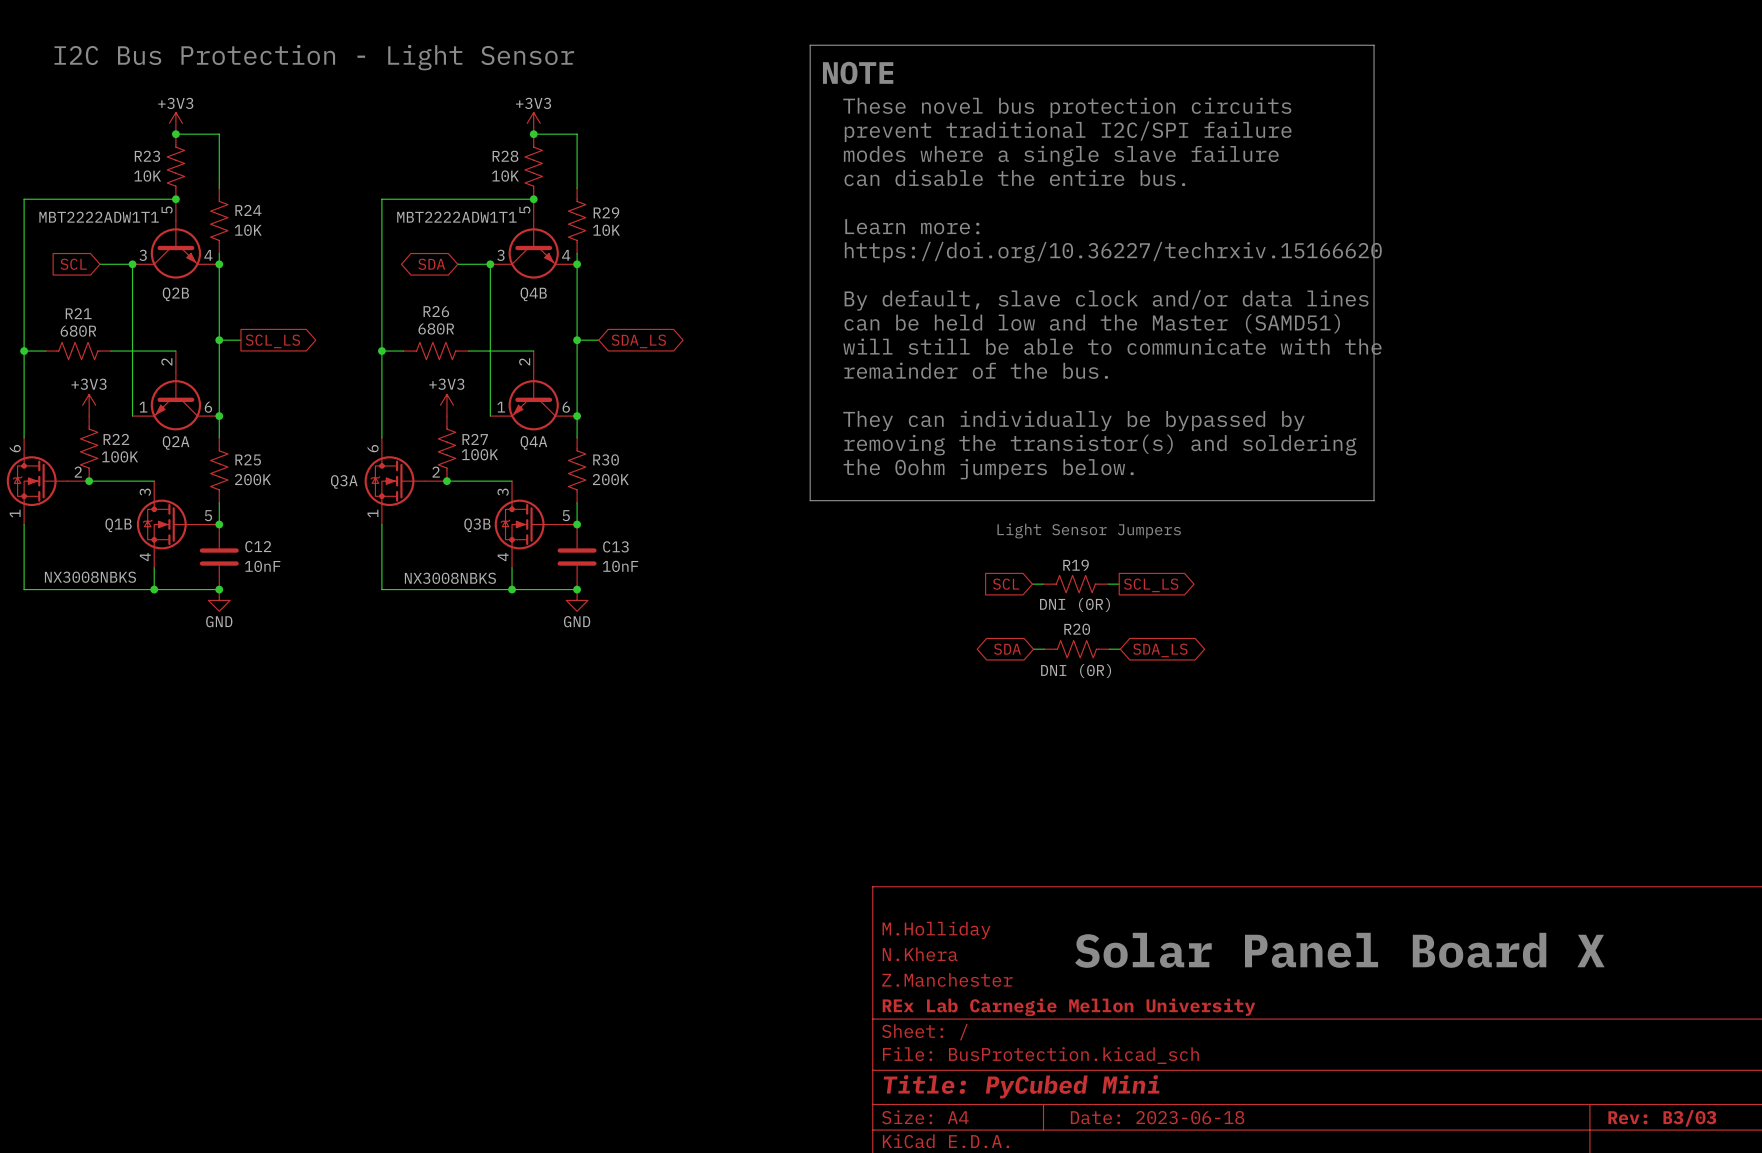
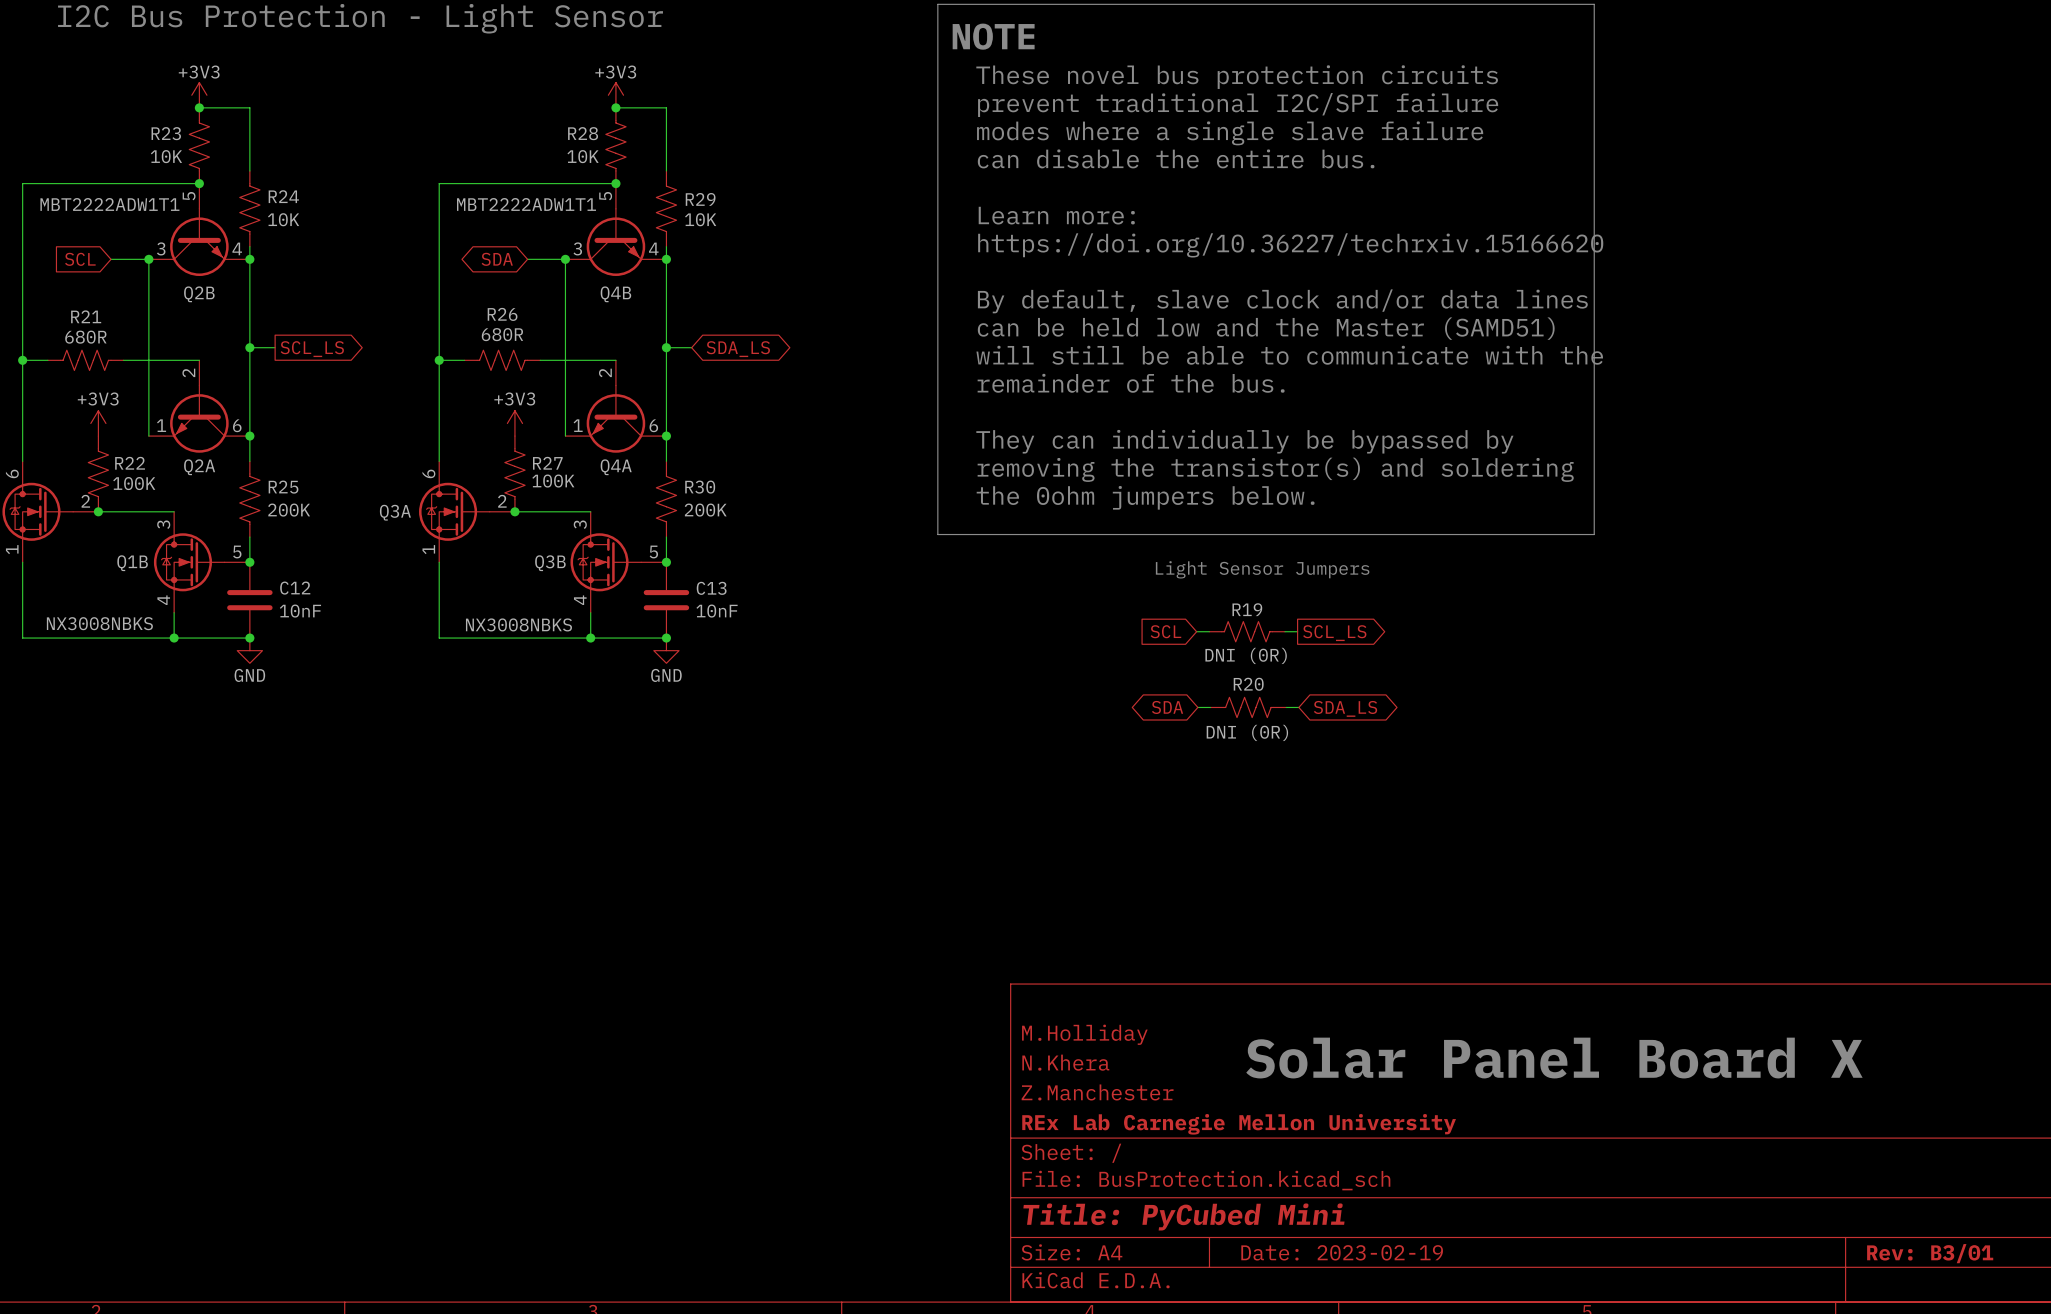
title block: Date: 2023-06-18 (1157, 1117) -> Date: 2023-02-19 (1342, 1252)
title block: Rev: B3/03 (1662, 1118) -> Rev: B3/01 (1930, 1253)

